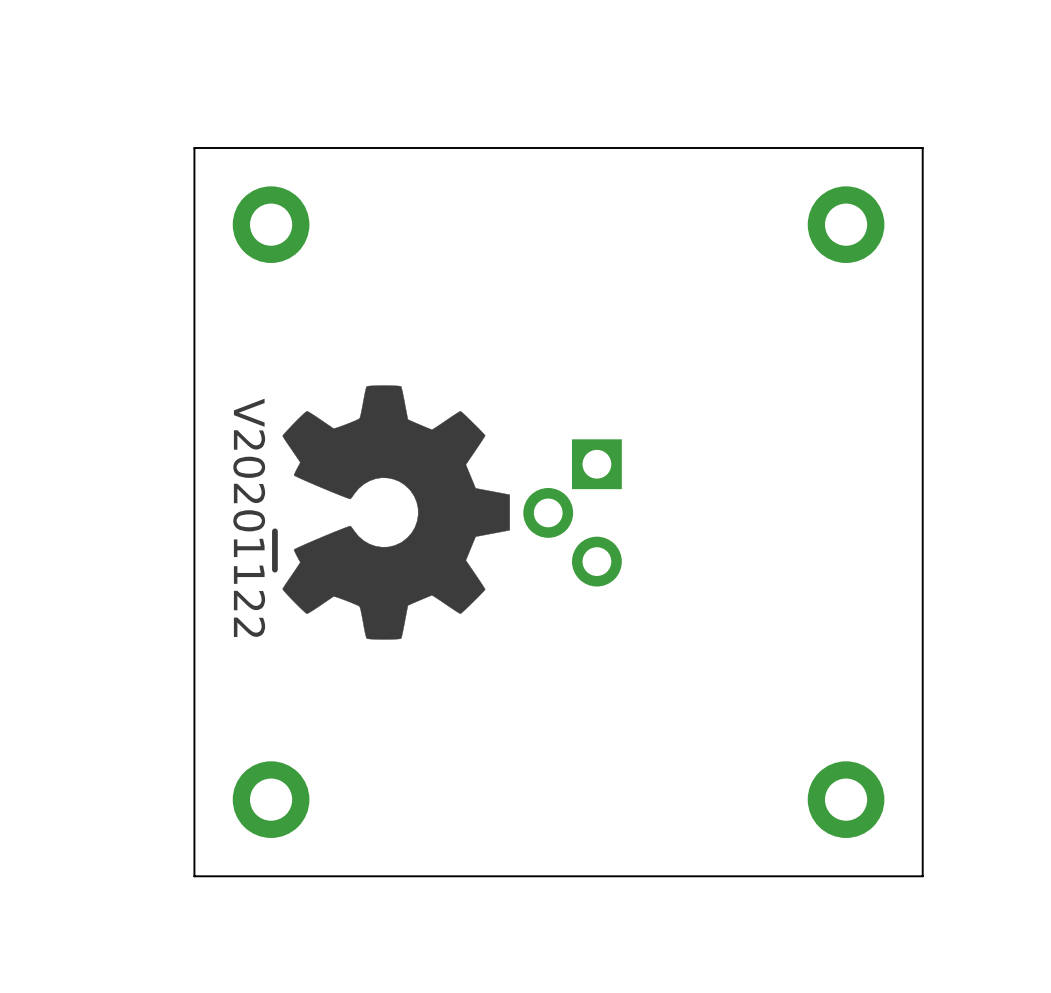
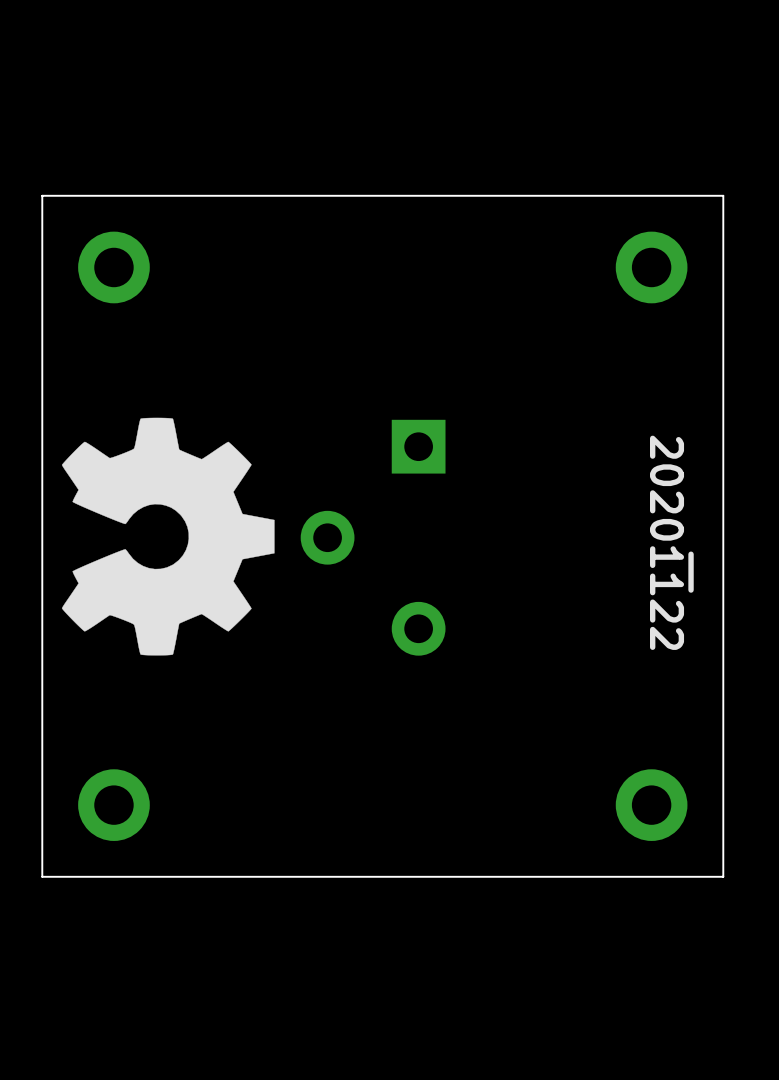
part footprint: [523, 439, 622, 587] -> [300, 419, 446, 656]
drawing position: (396, 512) -> (168, 536)
drawing: [272, 528, 278, 573] -> none
drawing: none -> [688, 551, 694, 593]

